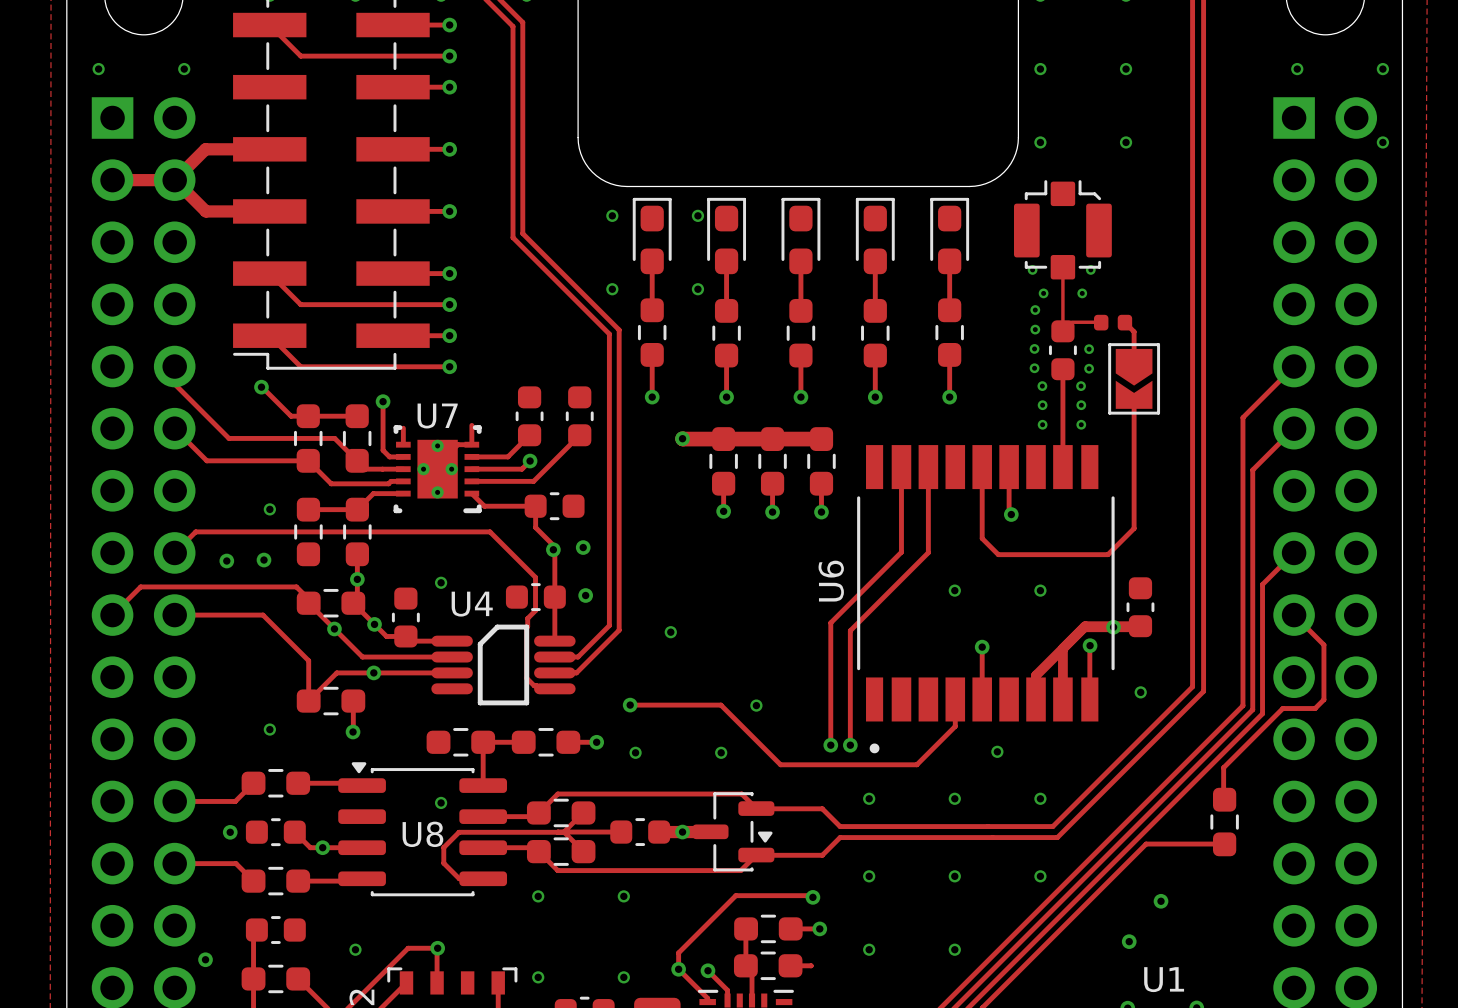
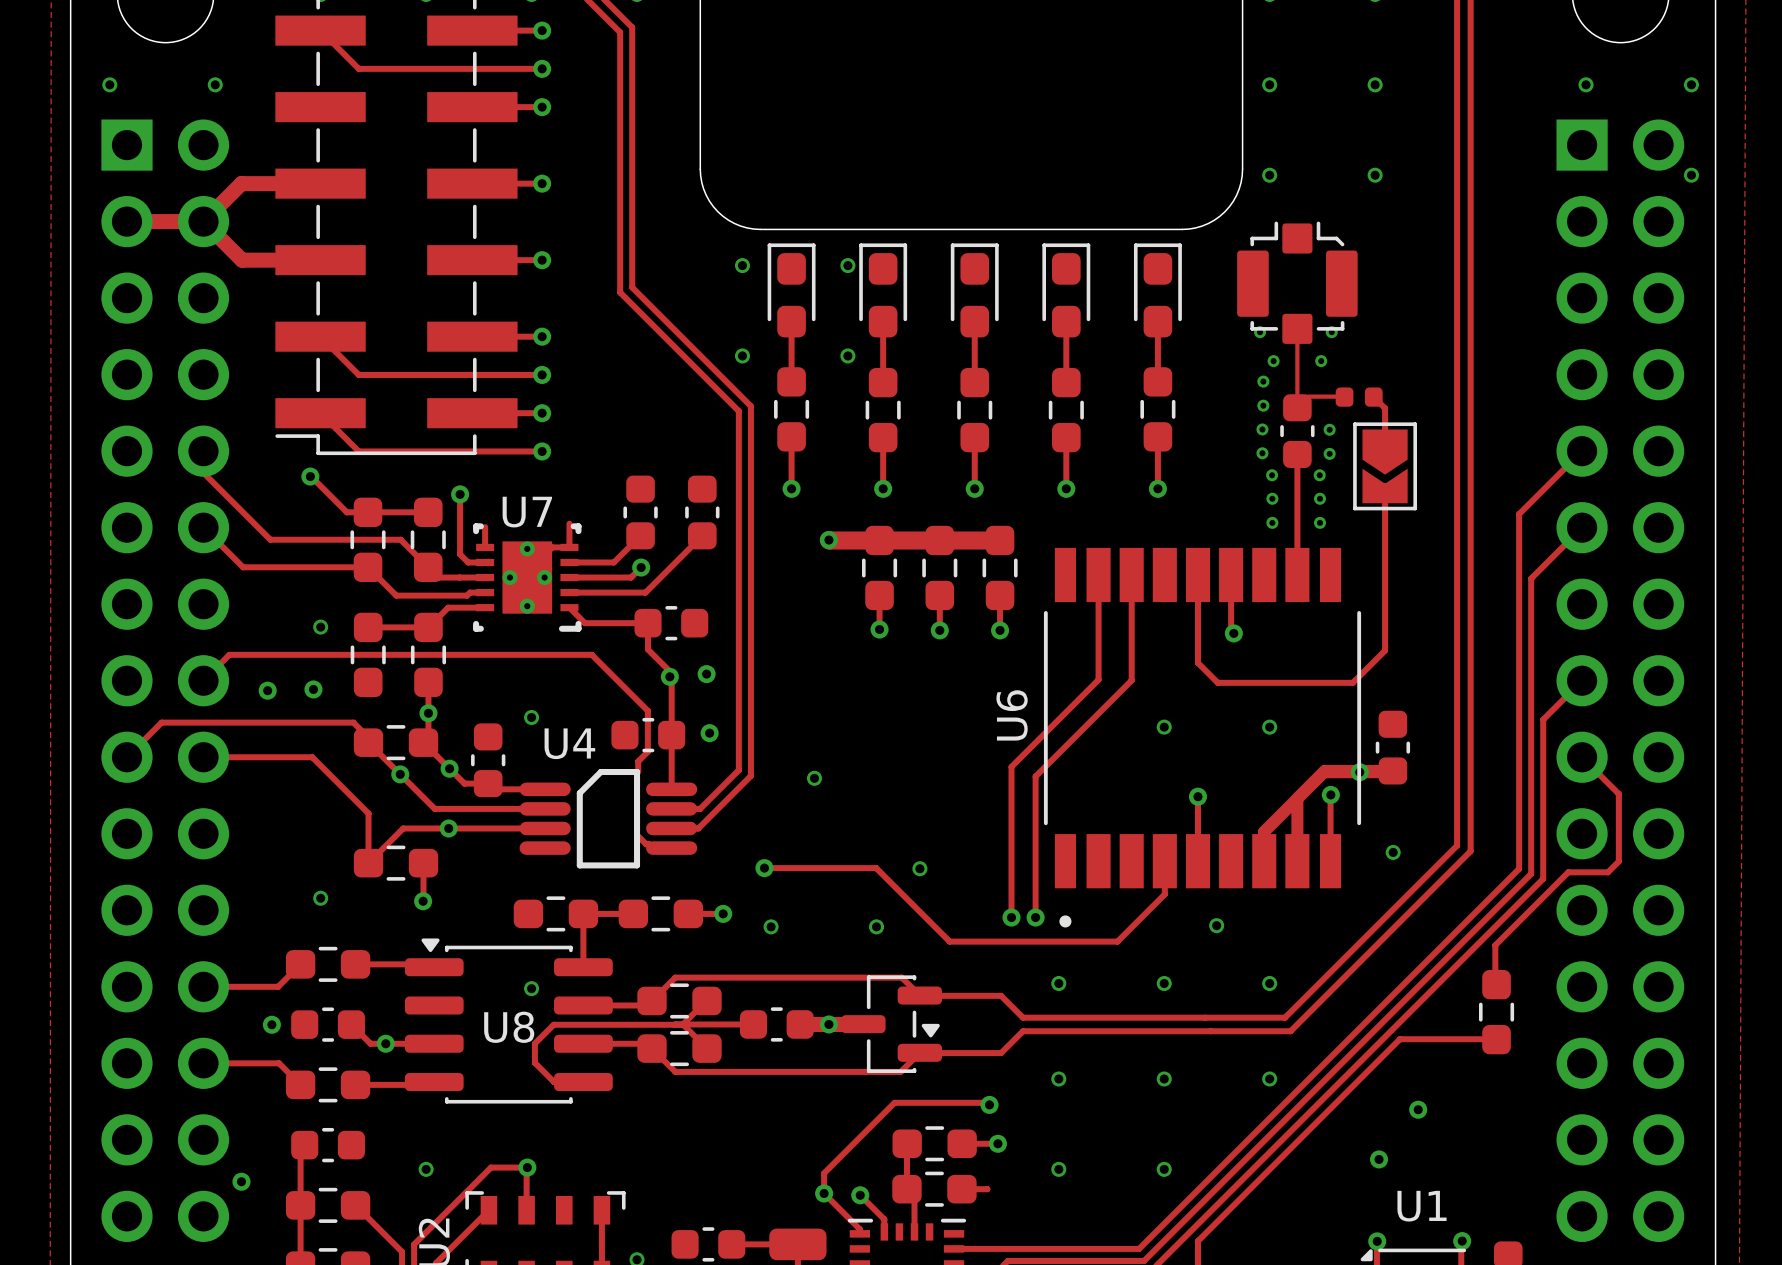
via: (538, 896) -> none
via: (623, 896) -> none
via: (538, 977) -> none
via: (623, 977) -> none

